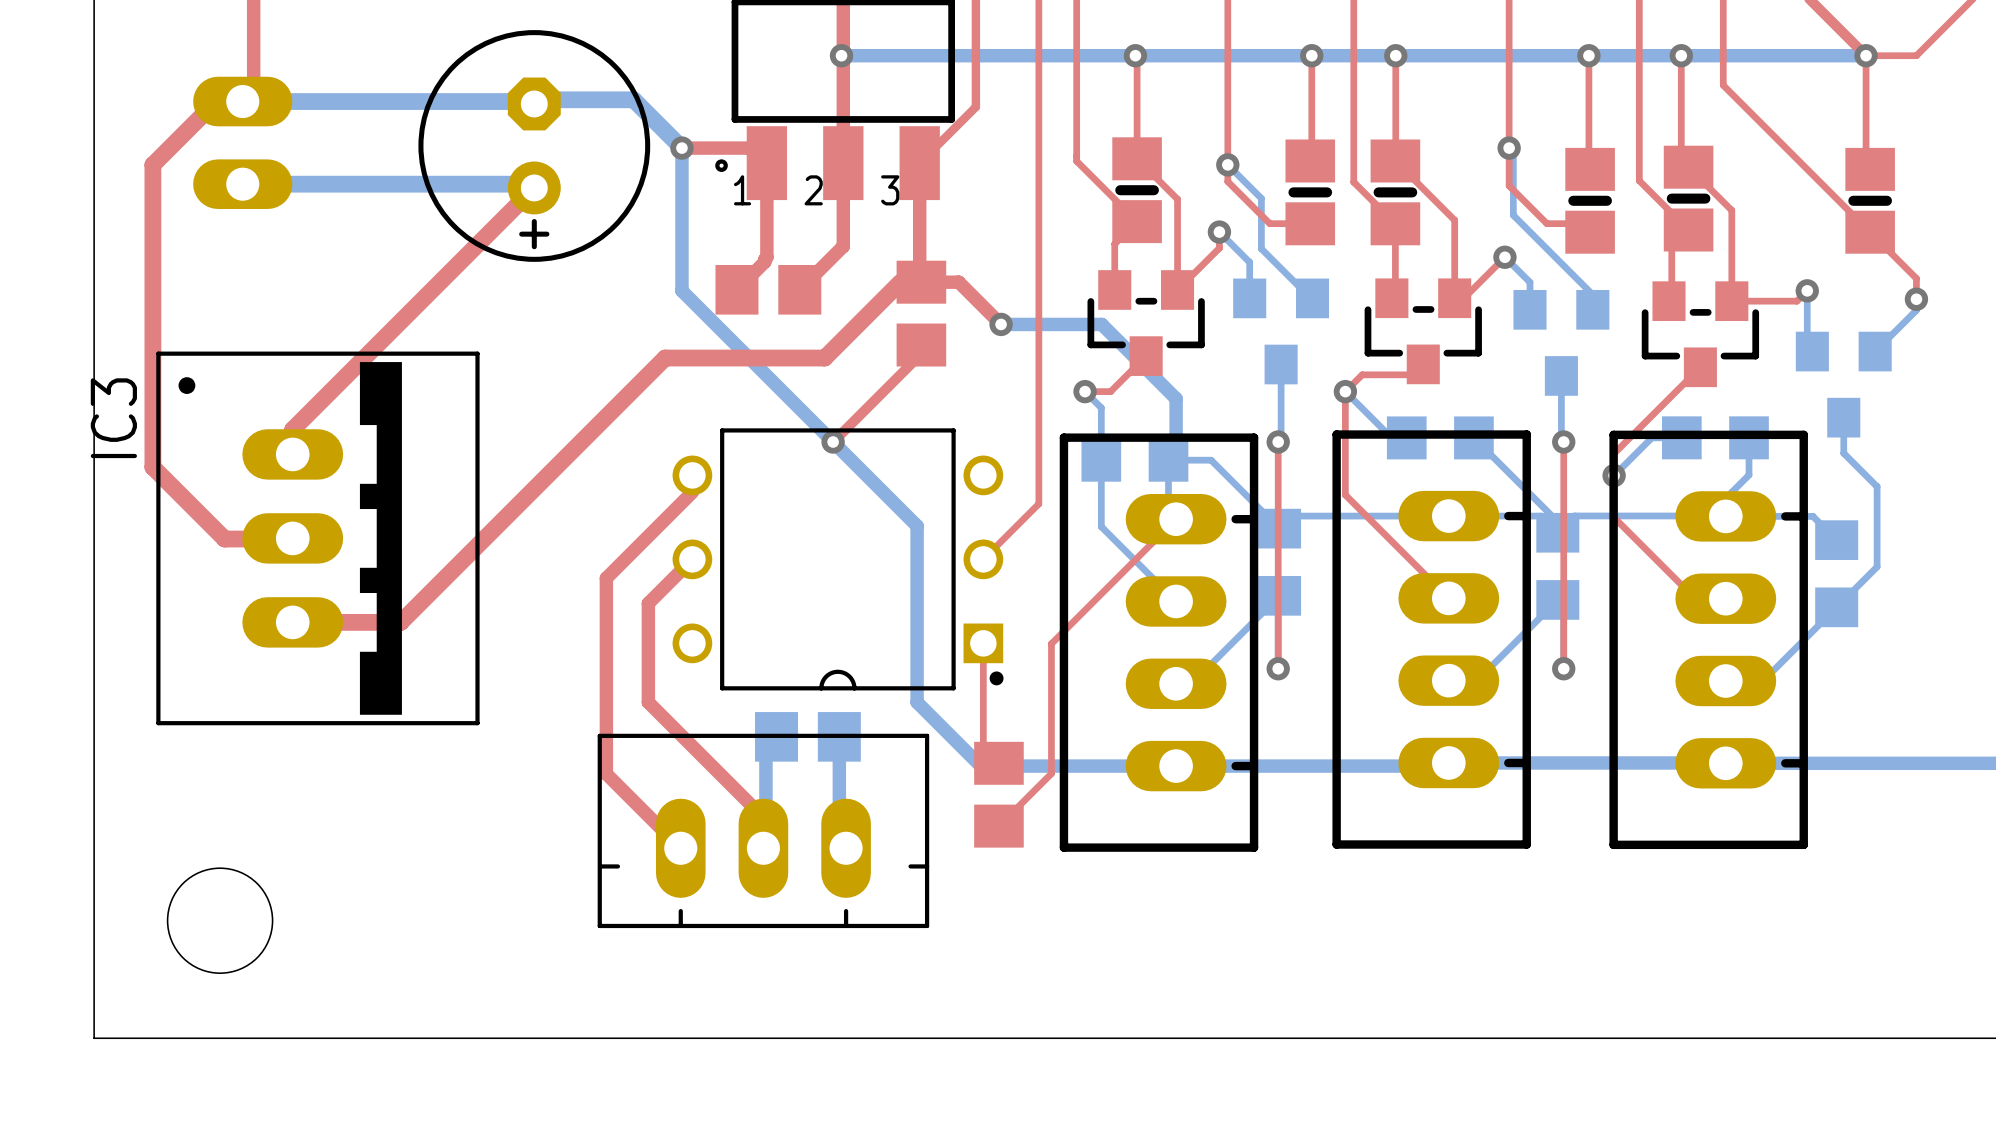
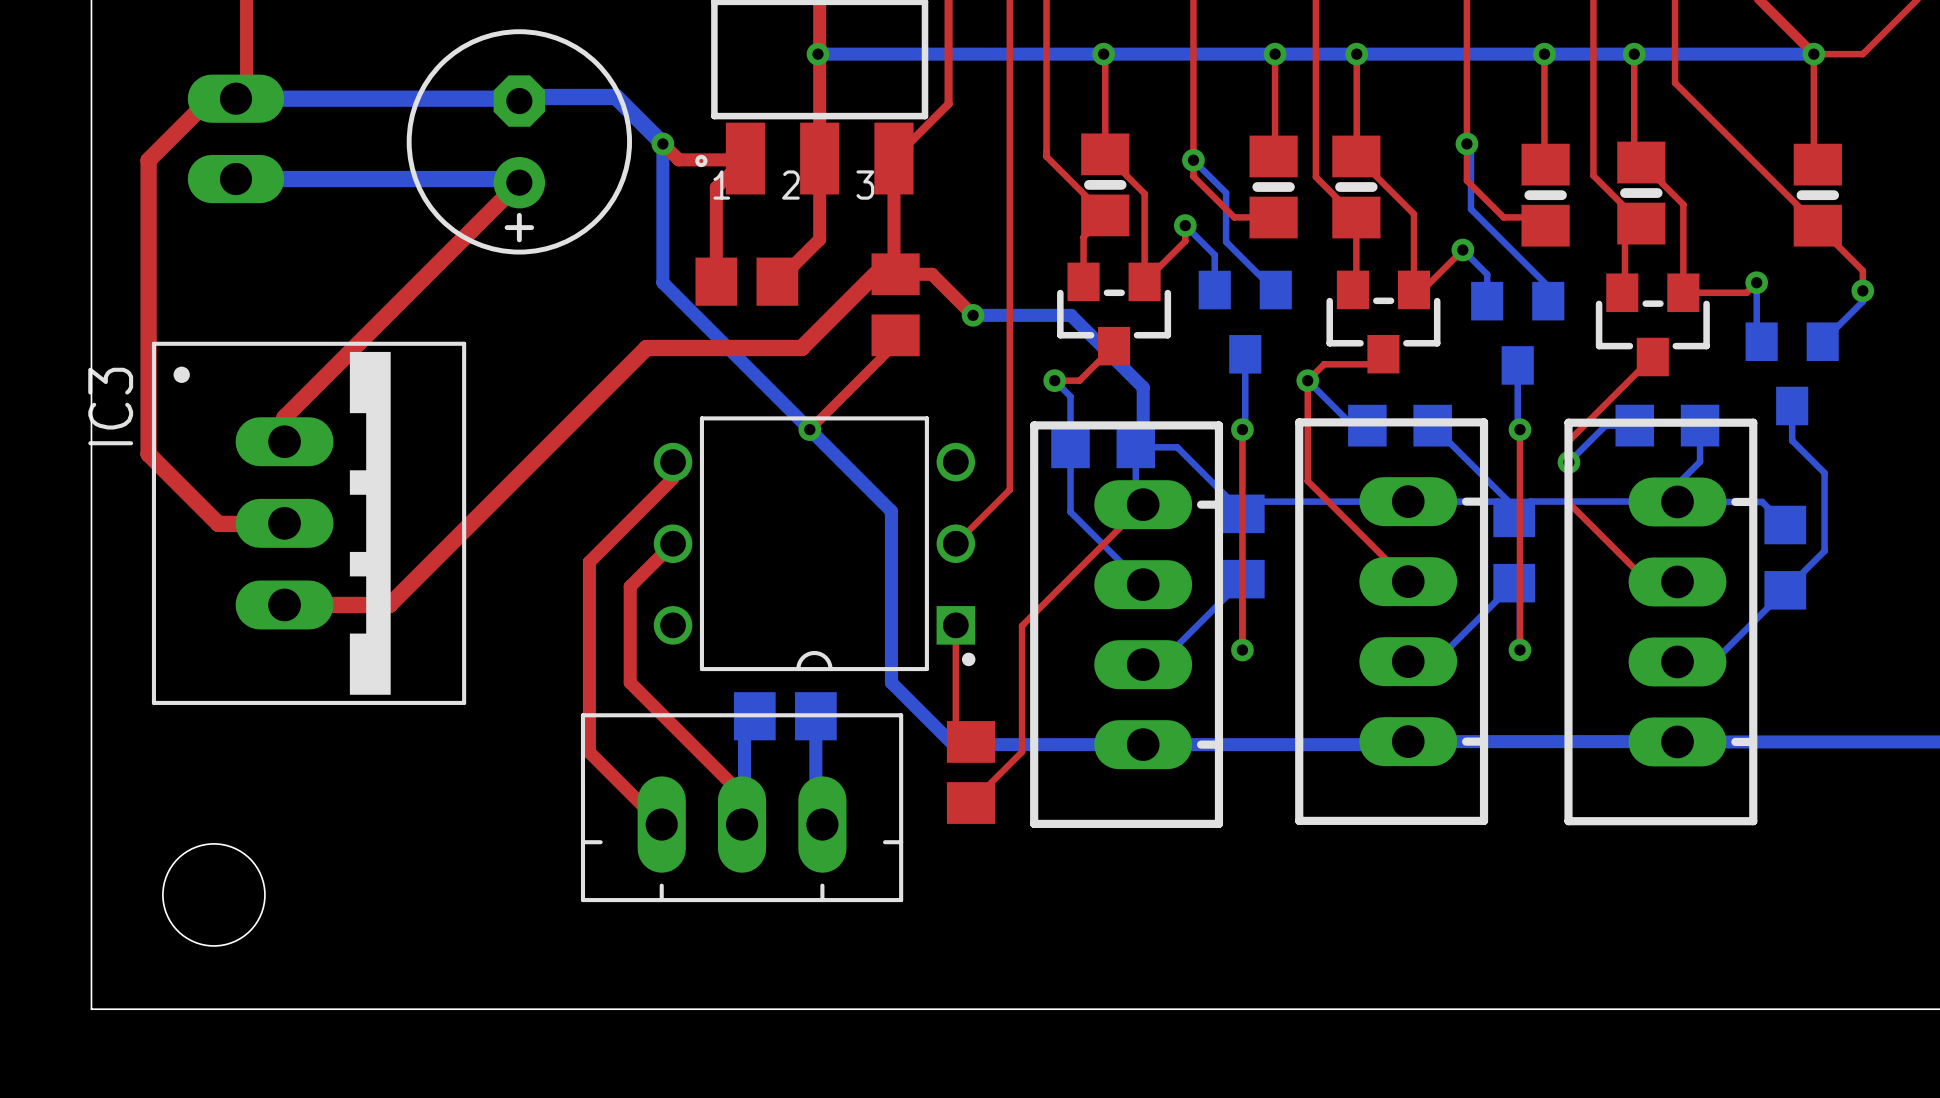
top track: (681, 148) (749, 148) (765, 164) -> none
top track: (766, 163) (766, 257) (764, 261) (736, 289) -> (662, 143) (678, 159) (744, 159) (716, 187) (716, 281)

